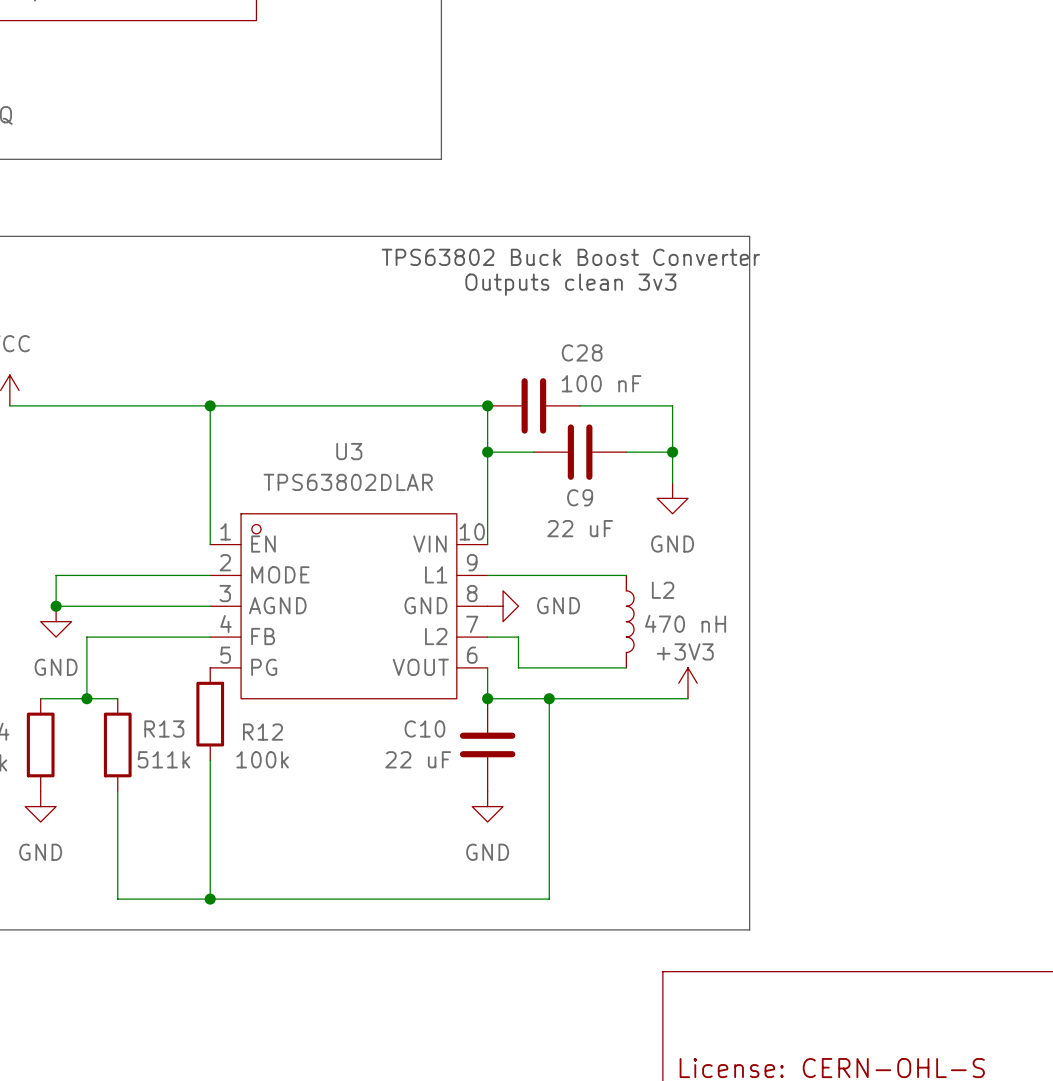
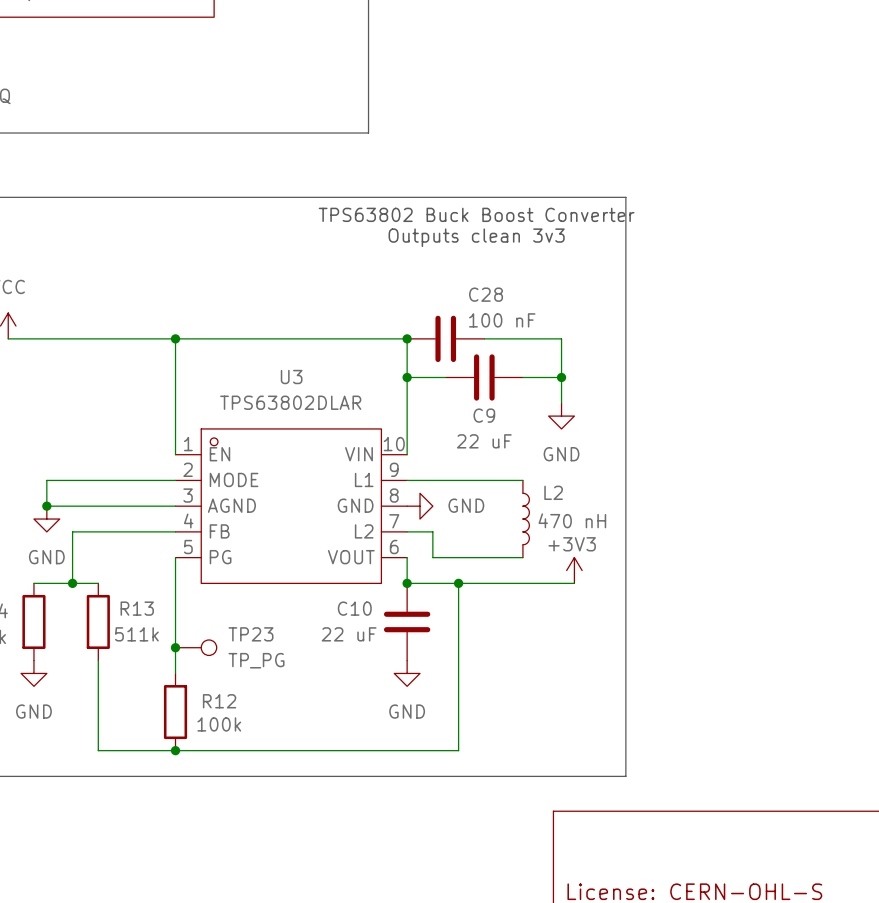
R12 position: (210, 714) -> (175, 712)
R12 name position: R12 (262, 732) -> R12 (219, 701)
R12 value position: 100k (262, 759) -> 100k (219, 724)
junction: none -> (175, 647)
TP23: none -> TP_PG (196, 647)
wire: (210, 806) (210, 899) -> (175, 557) (175, 634)

